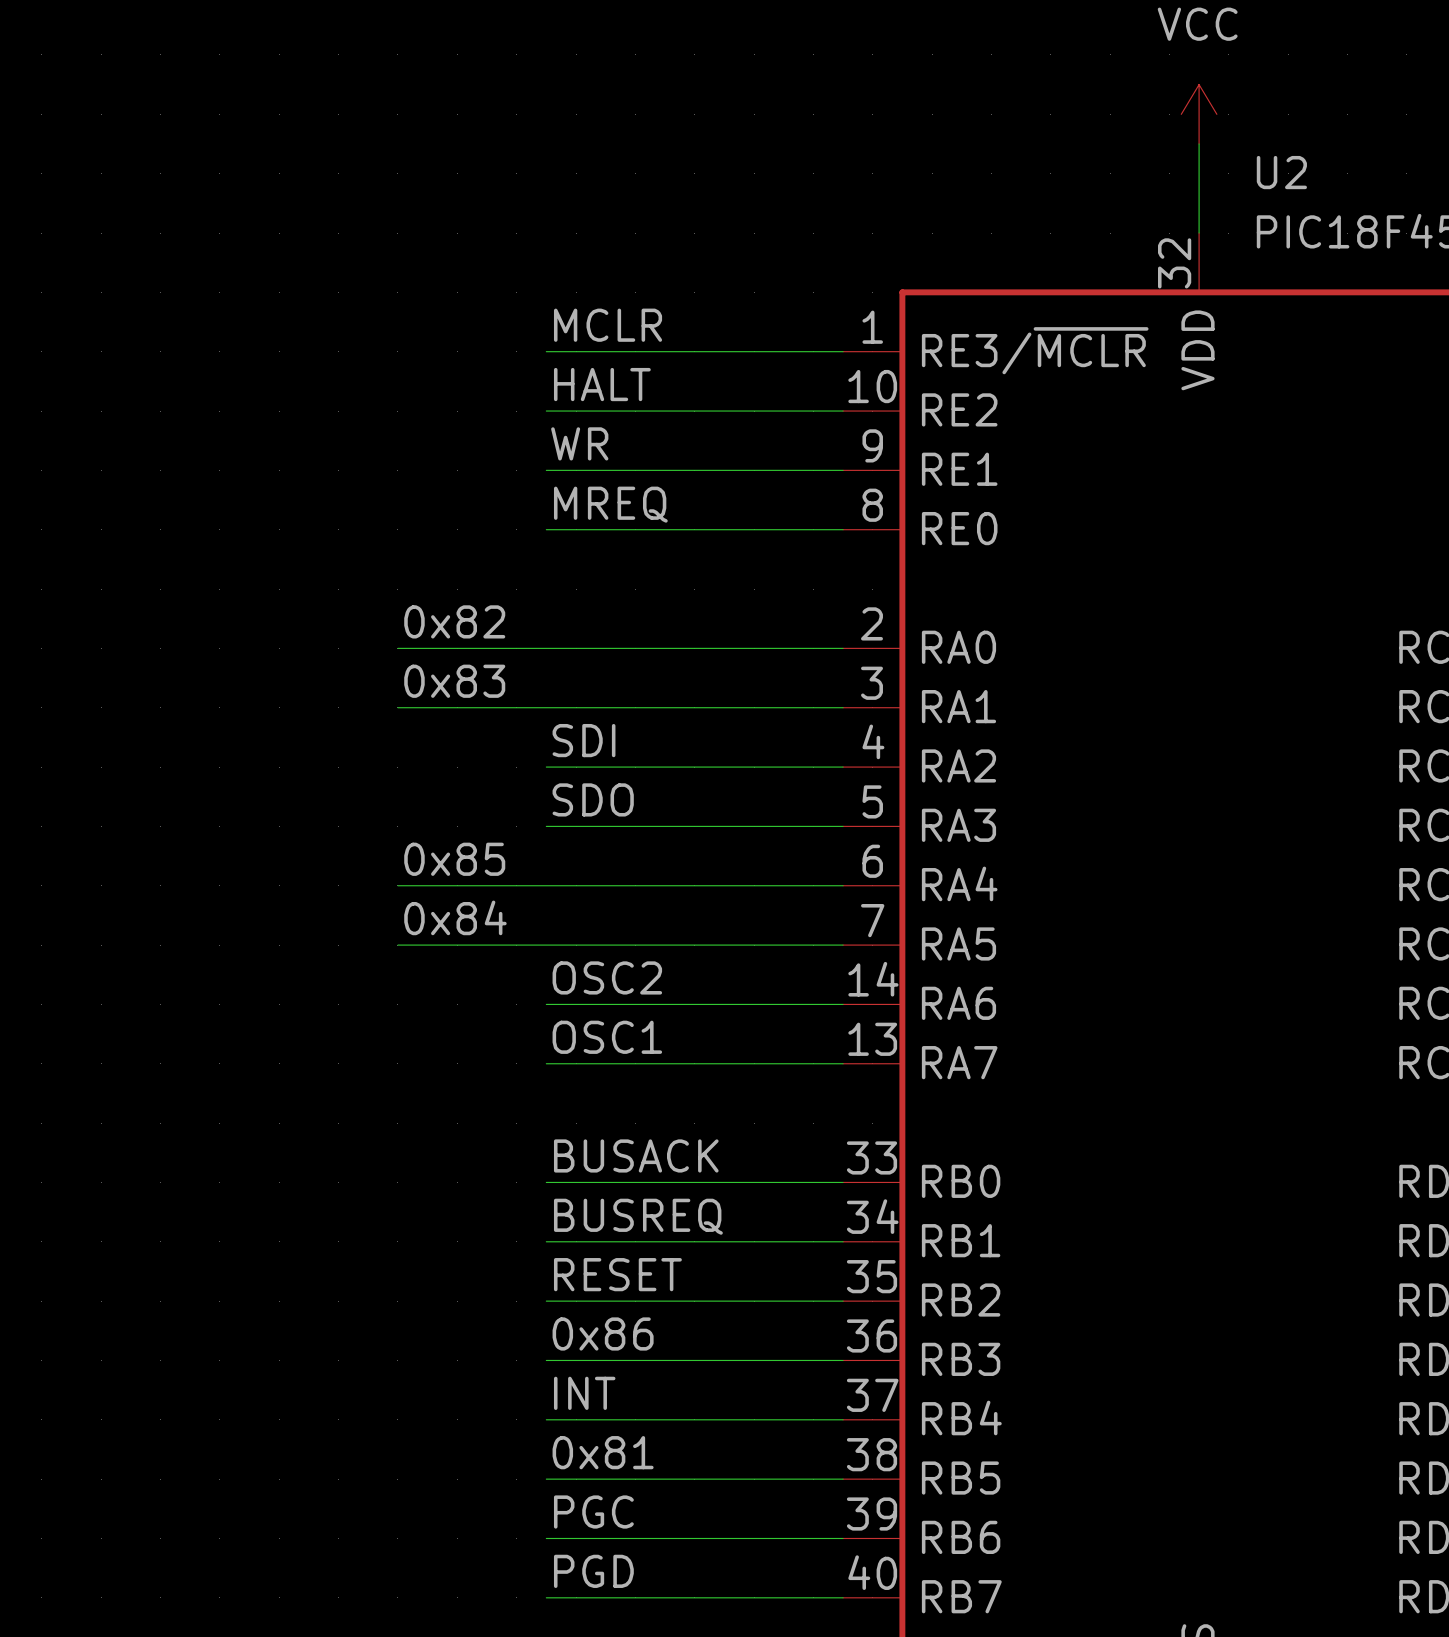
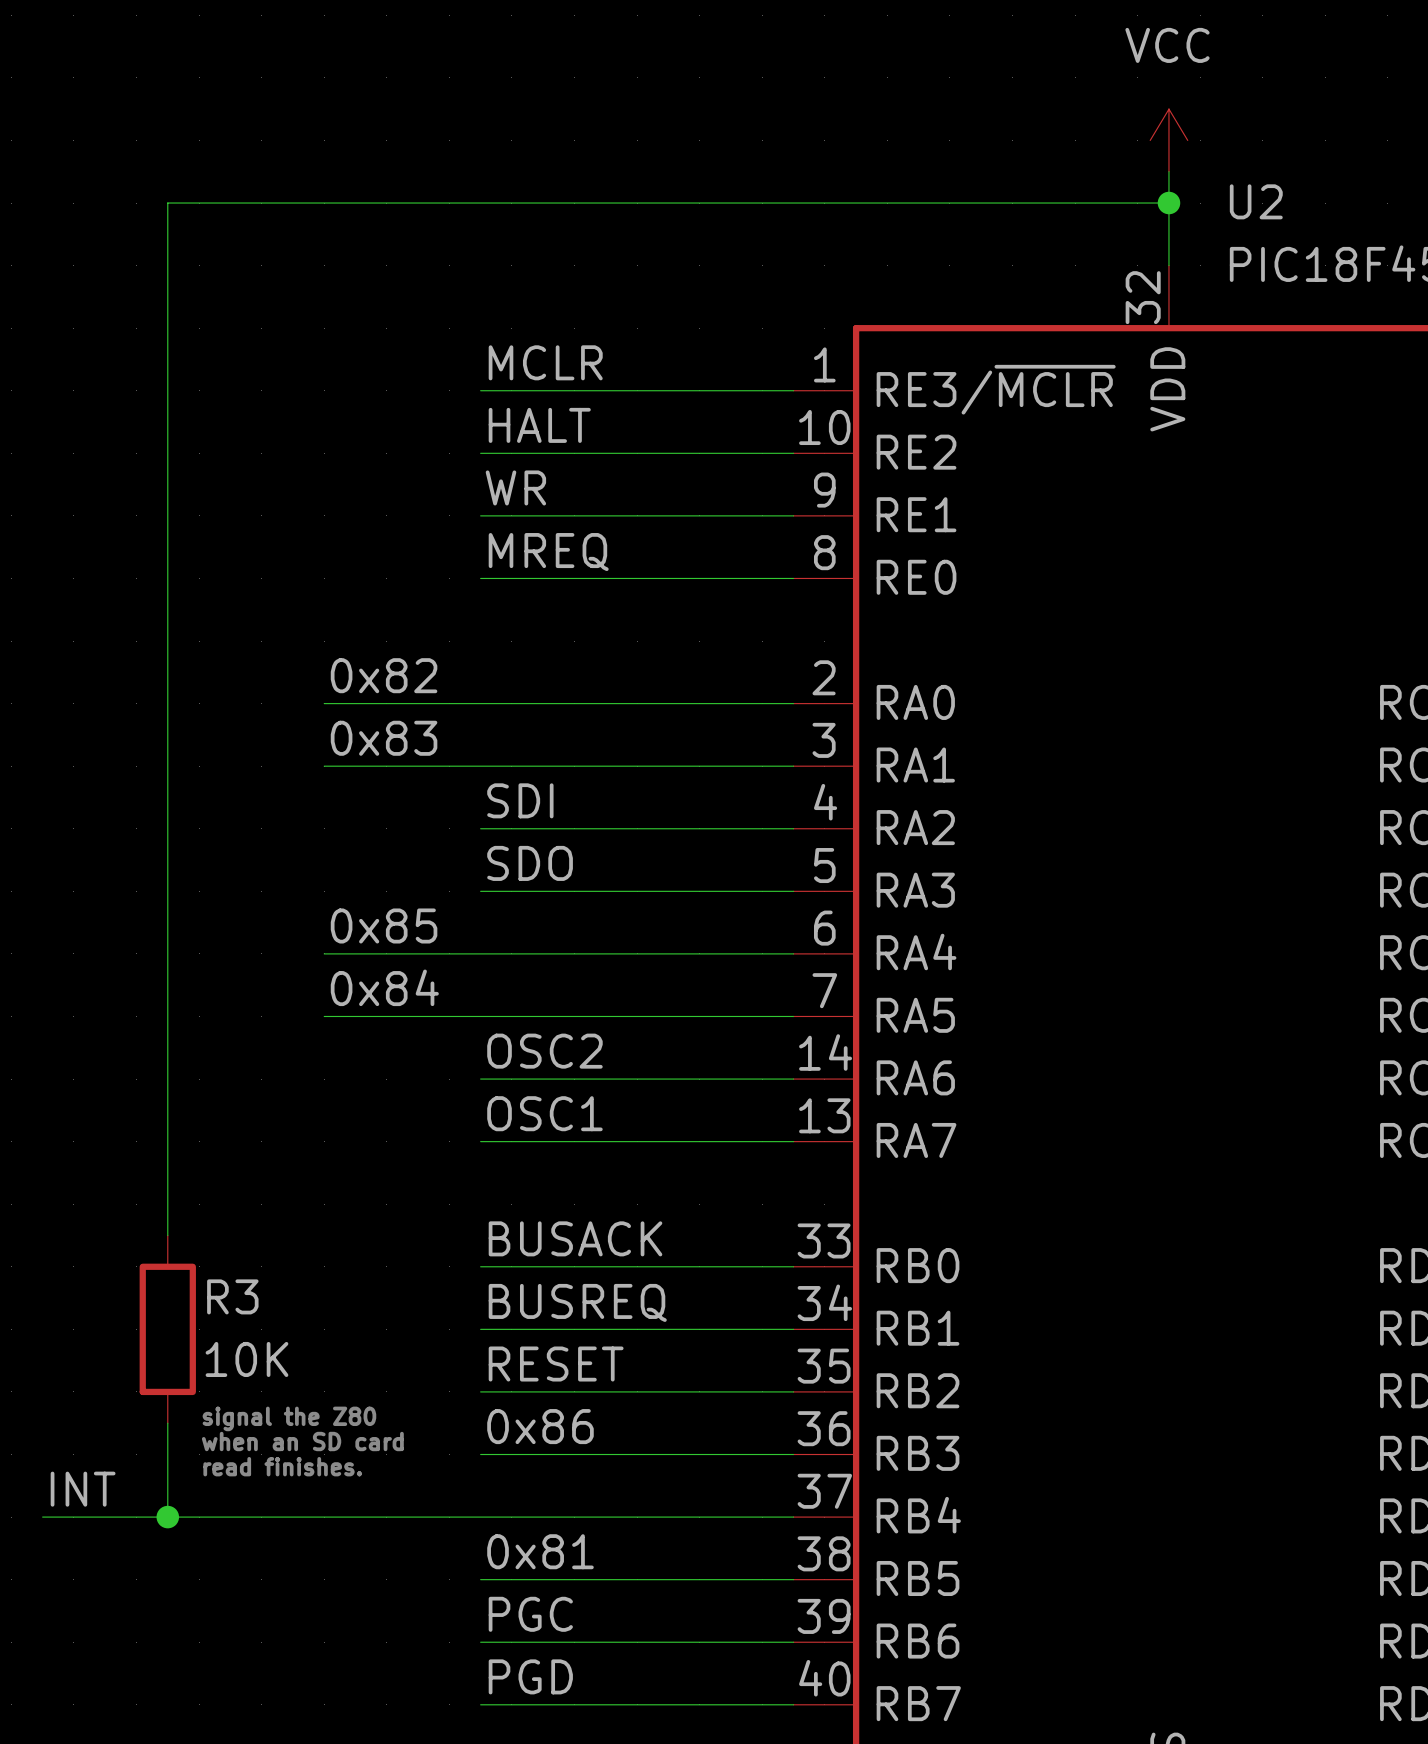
wire: none -> (1168, 203) (167, 203) (167, 1235)
junction: none -> (1168, 203)
R3: none -> 10K (167, 1329)
text: none -> signal the Z80 (289, 1418)
wire: none -> (167, 1423) (167, 1517)
text: none -> when an SD card (302, 1441)
text: none -> read finishes. (282, 1466)
label position: INT (584, 1393) -> INT (83, 1489)
wire: none -> (42, 1517) (480, 1517)
junction: none -> (167, 1517)

